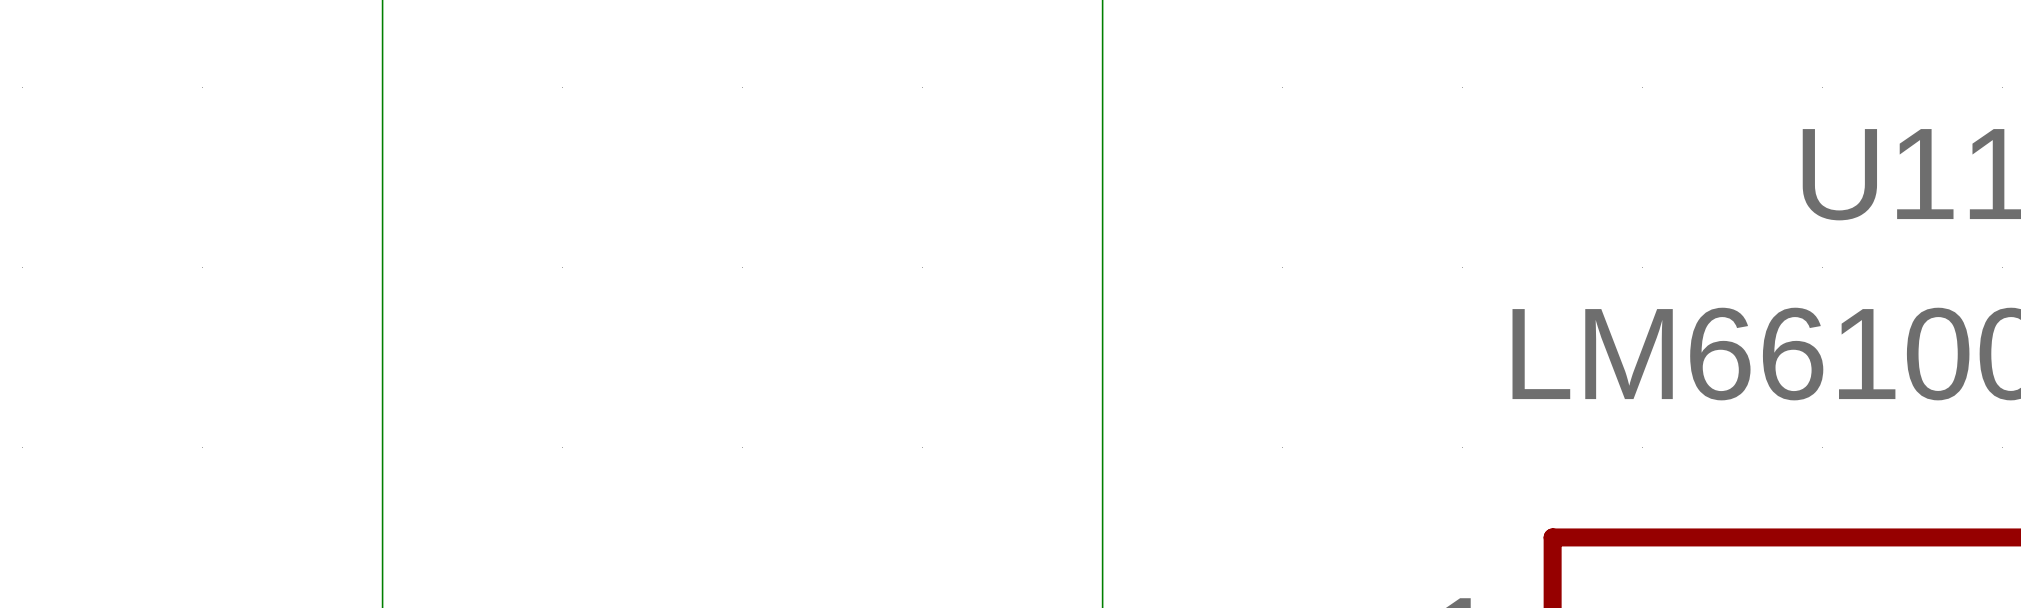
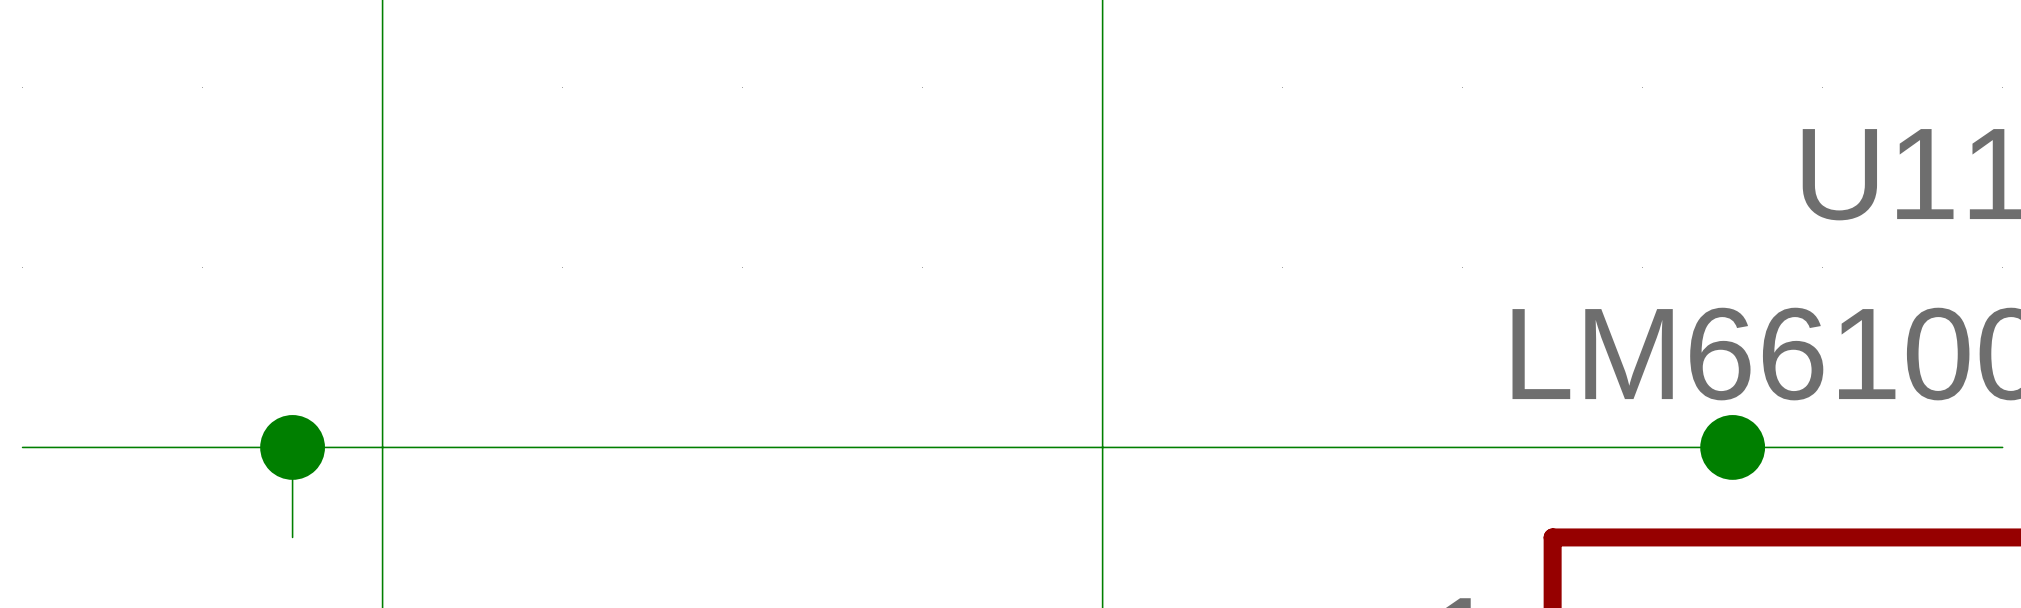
wire: none -> (22, 447) (2002, 447)
wire: none -> (292, 447) (292, 537)
junction: none -> (292, 447)
junction: none -> (1732, 447)

